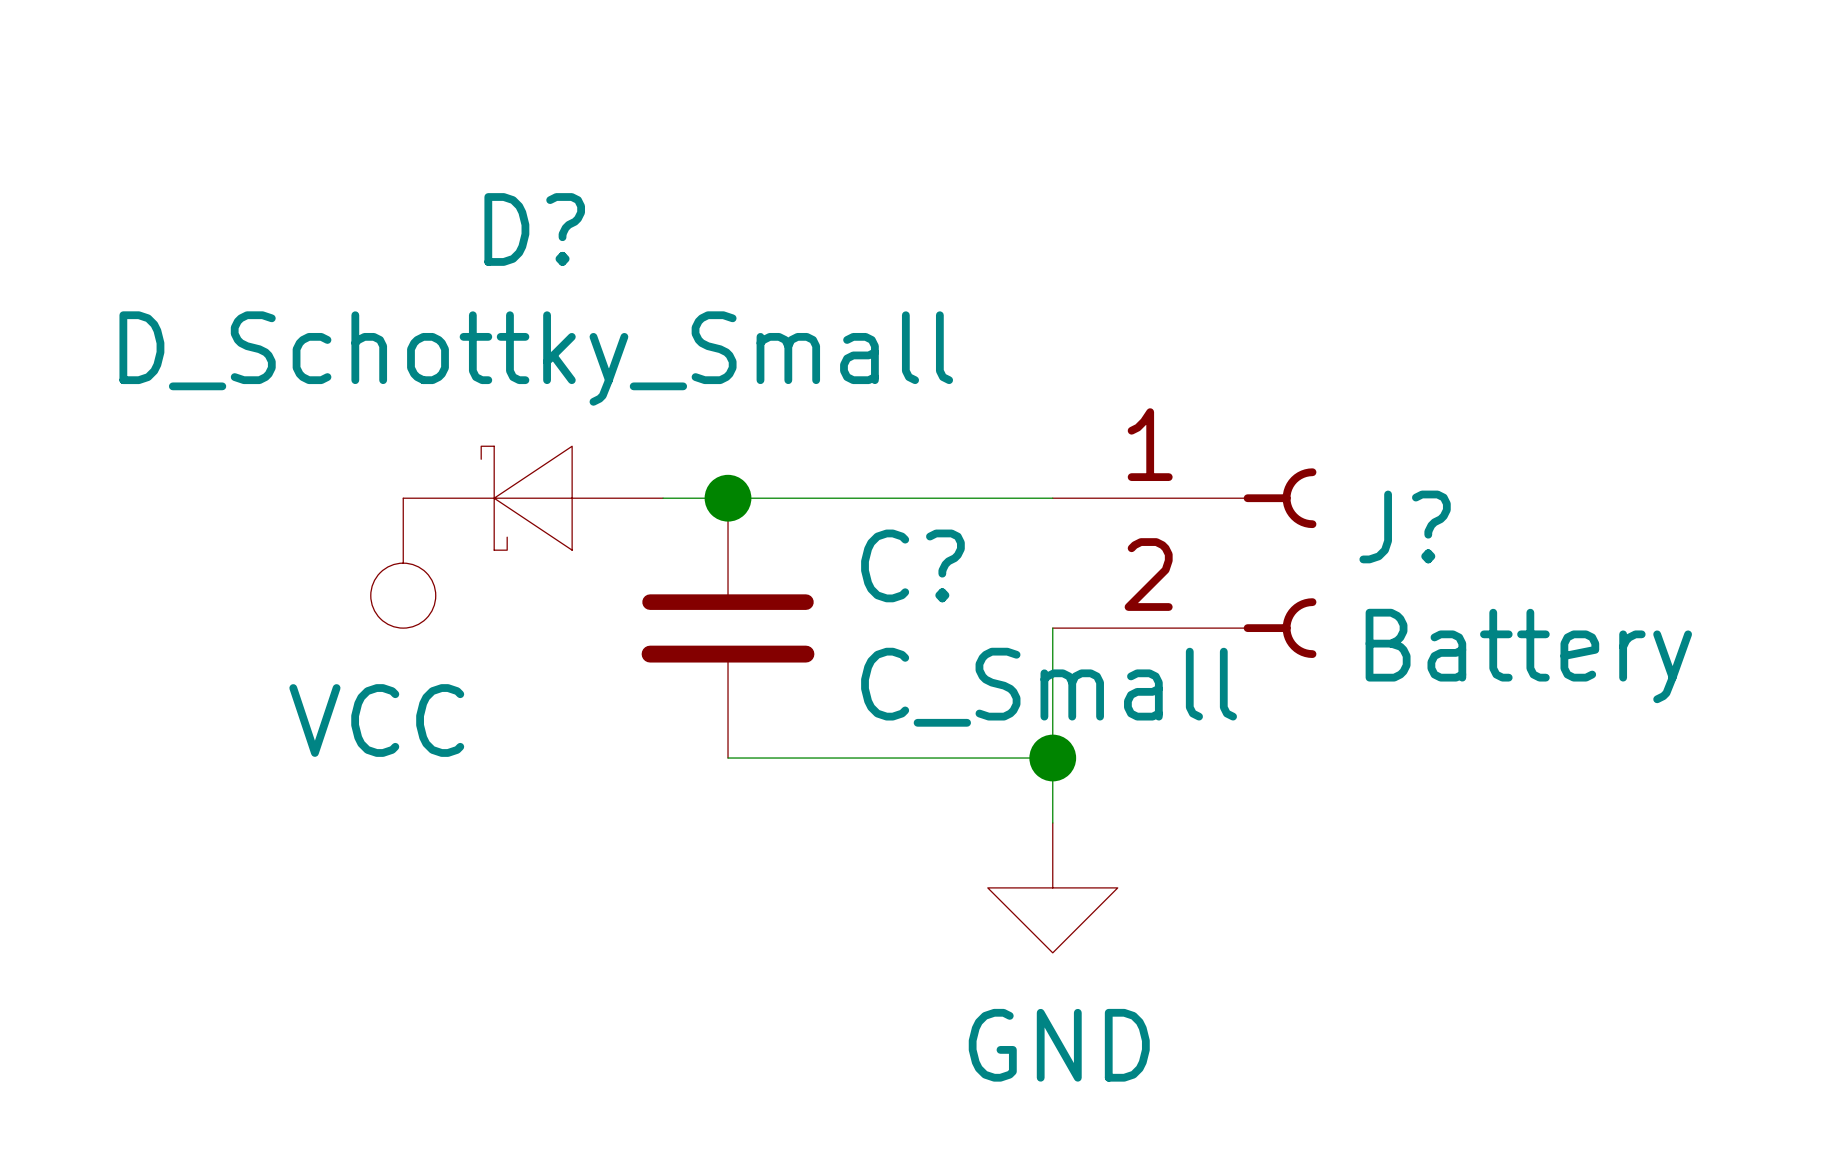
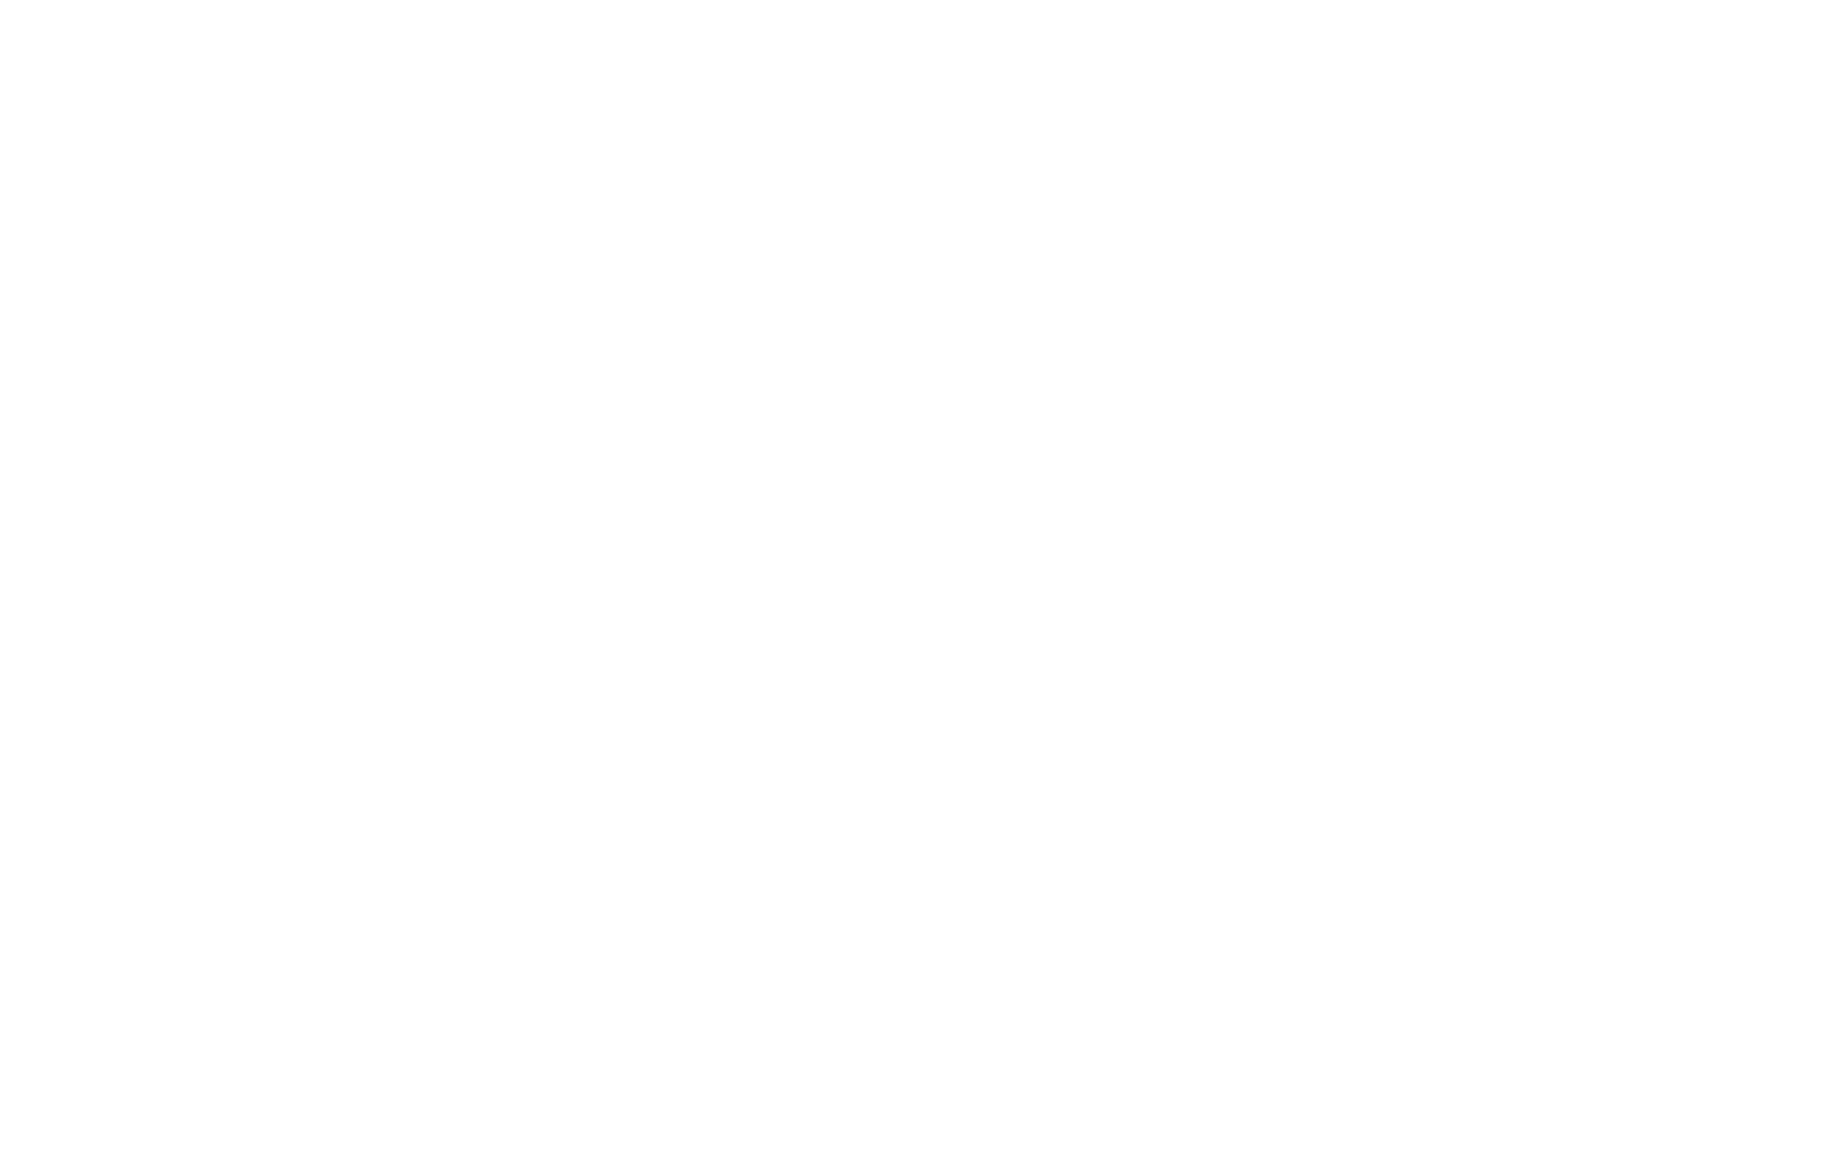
D?: D_Schottky_Small (533, 498) -> none
wire: (663, 498) (1052, 498) -> none
junction: (728, 498) -> none
power symbol: VCC (403, 563) -> none
J?: Battery (1184, 563) -> none
C?: C_Small (728, 628) -> none
wire: (1052, 628) (1052, 822) -> none
wire: (728, 758) (1052, 758) -> none
junction: (1052, 758) -> none
power symbol: GND (1052, 887) -> none

